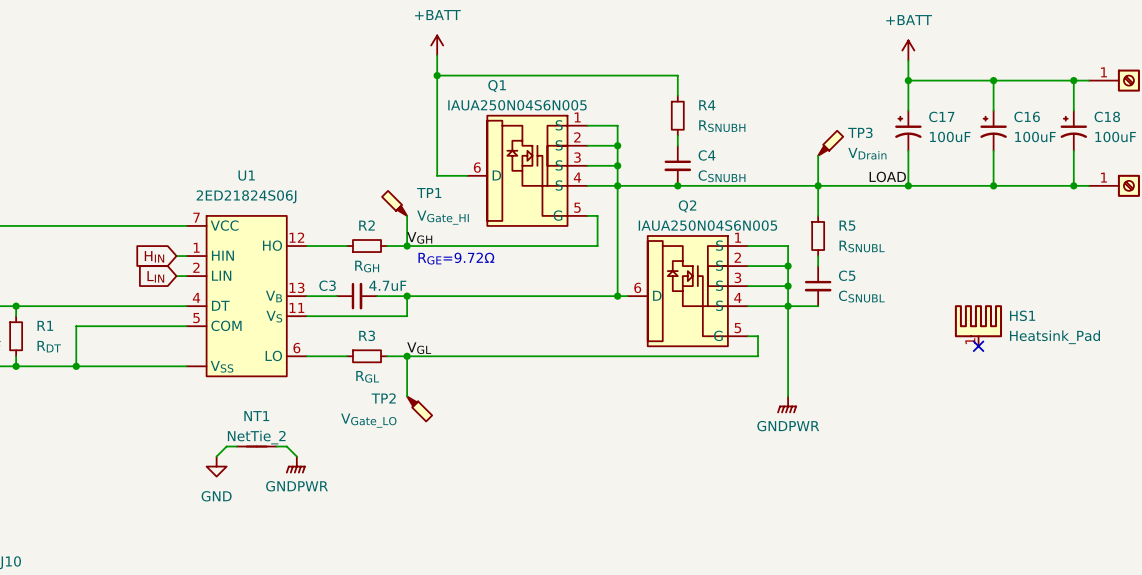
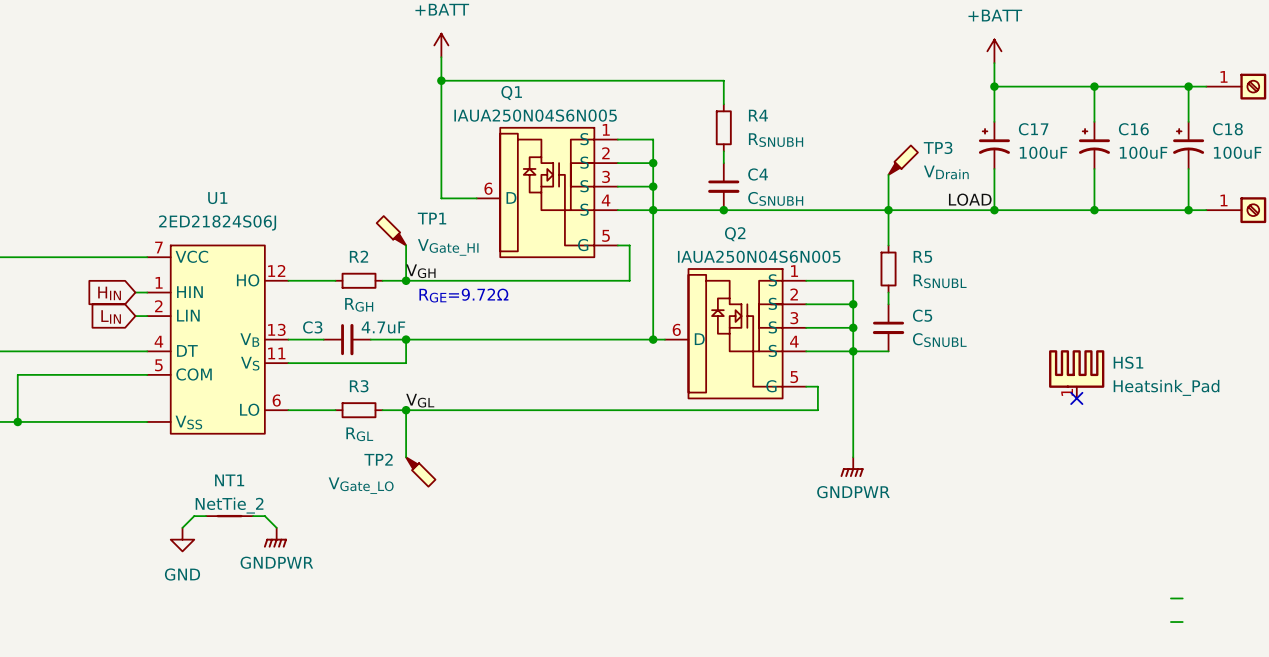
wire: none -> (1170, 598) (1182, 598)
wire: none -> (1170, 622) (1182, 622)

